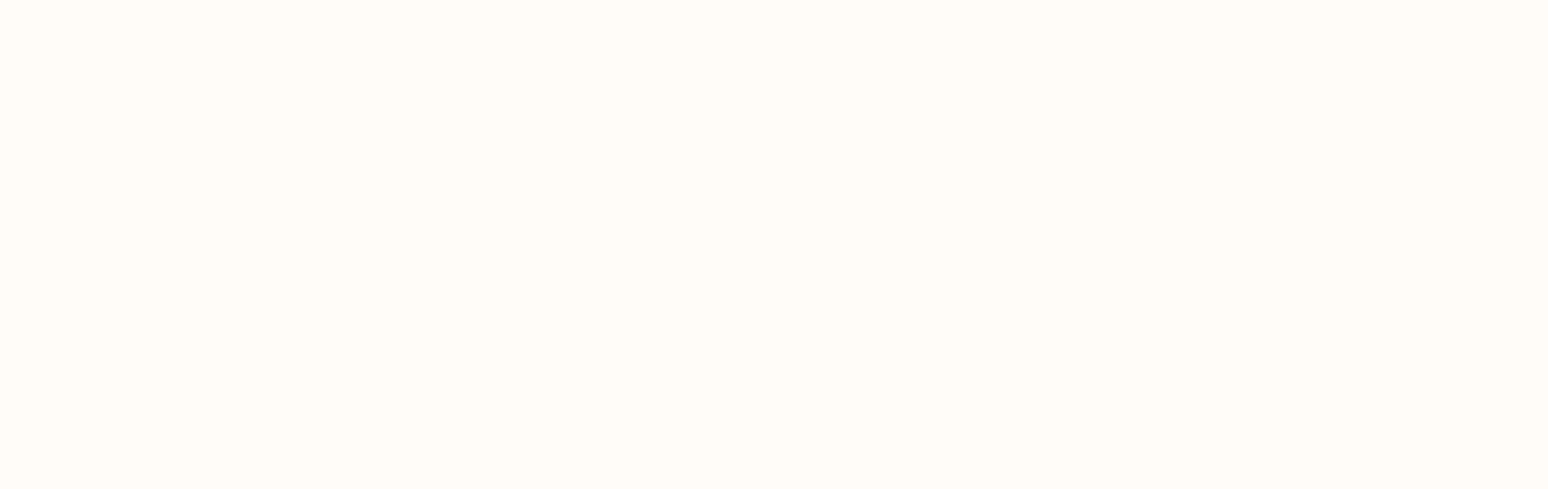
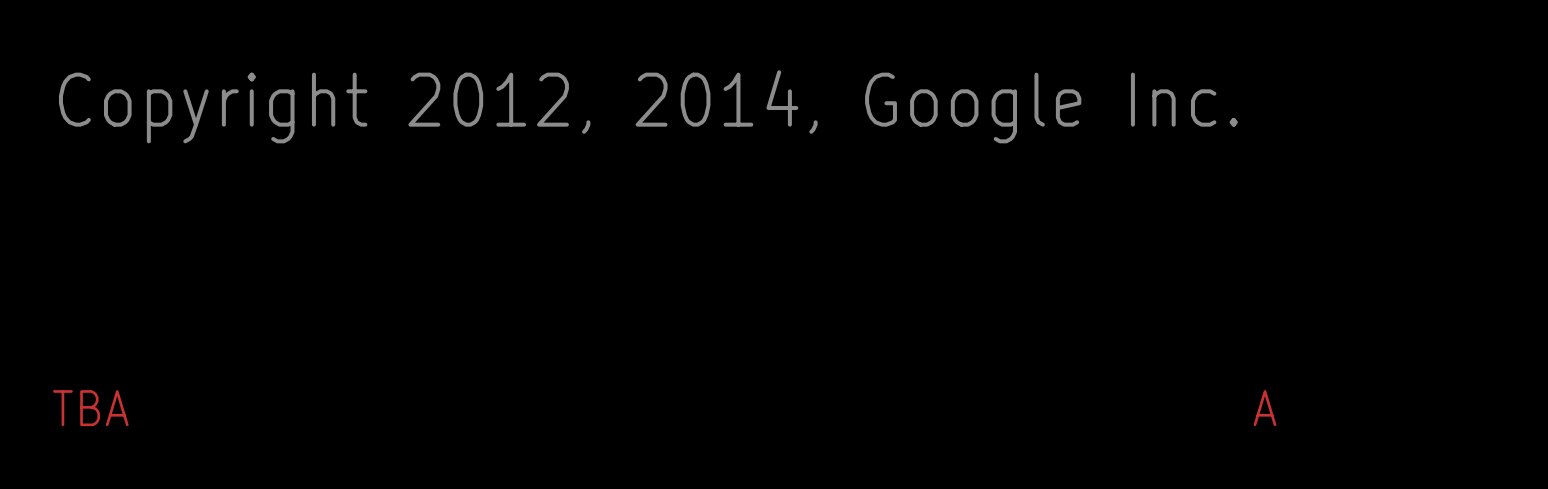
text: none -> Copyright 2012, 2014, Google Inc. (648, 106)
text: none -> TBA (90, 408)
text: none -> A (1264, 408)

